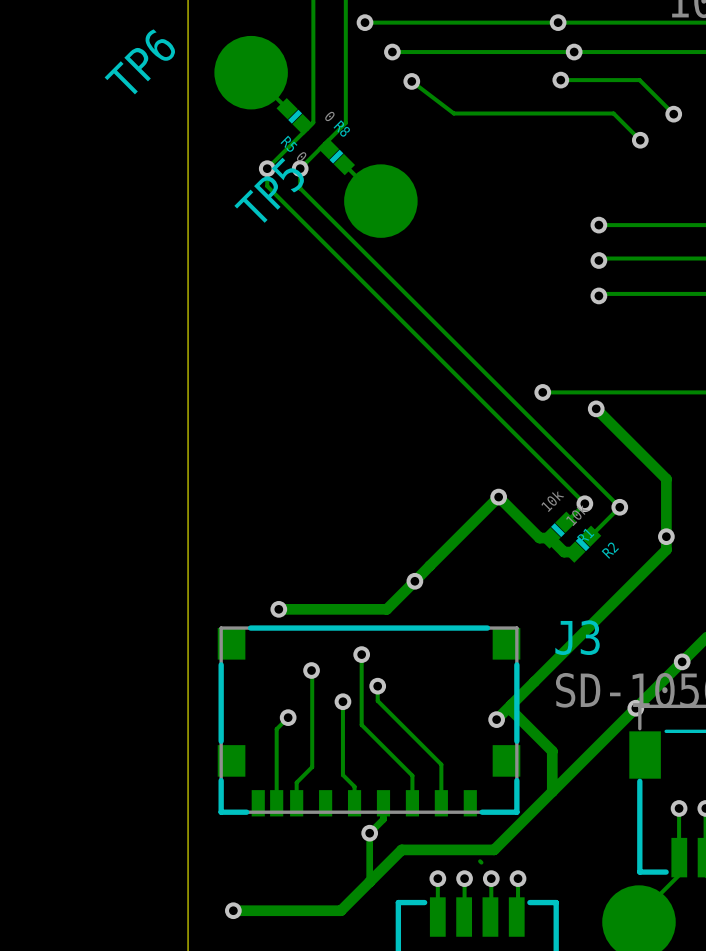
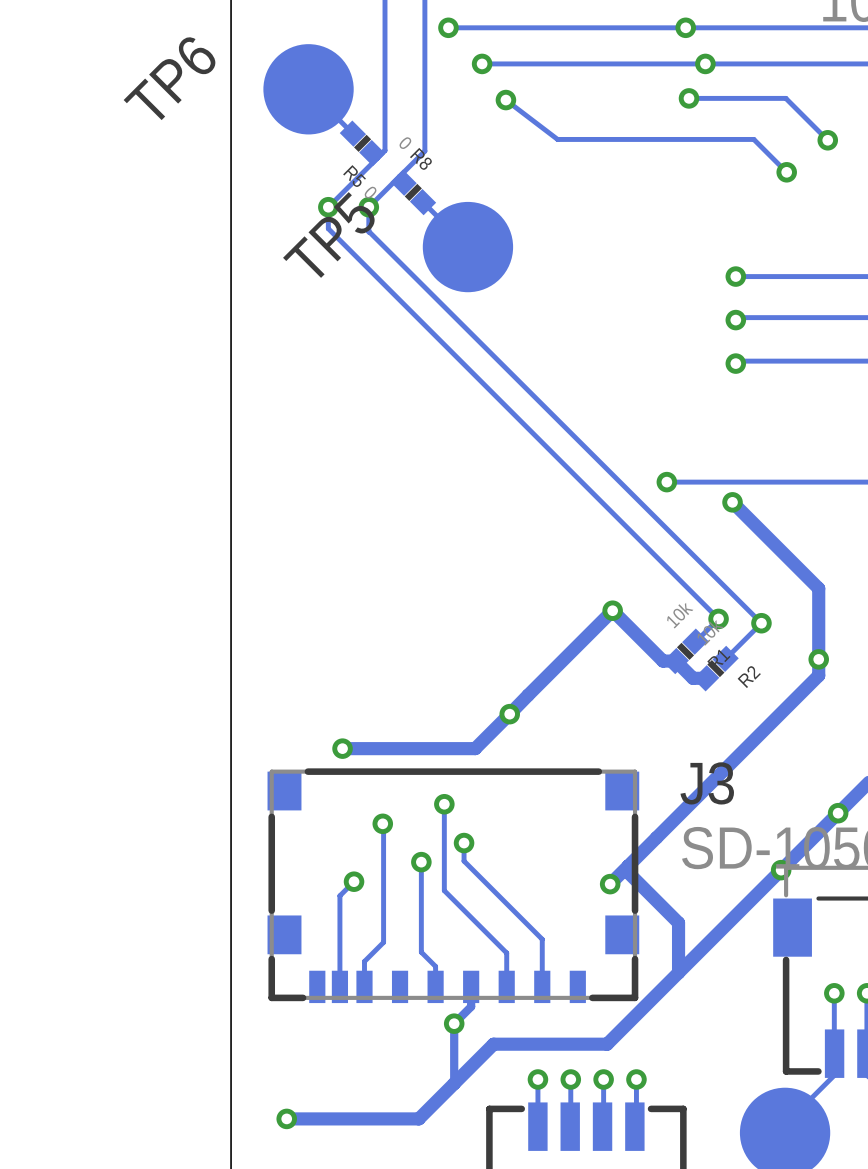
track: (480, 861) (481, 862) -> none

